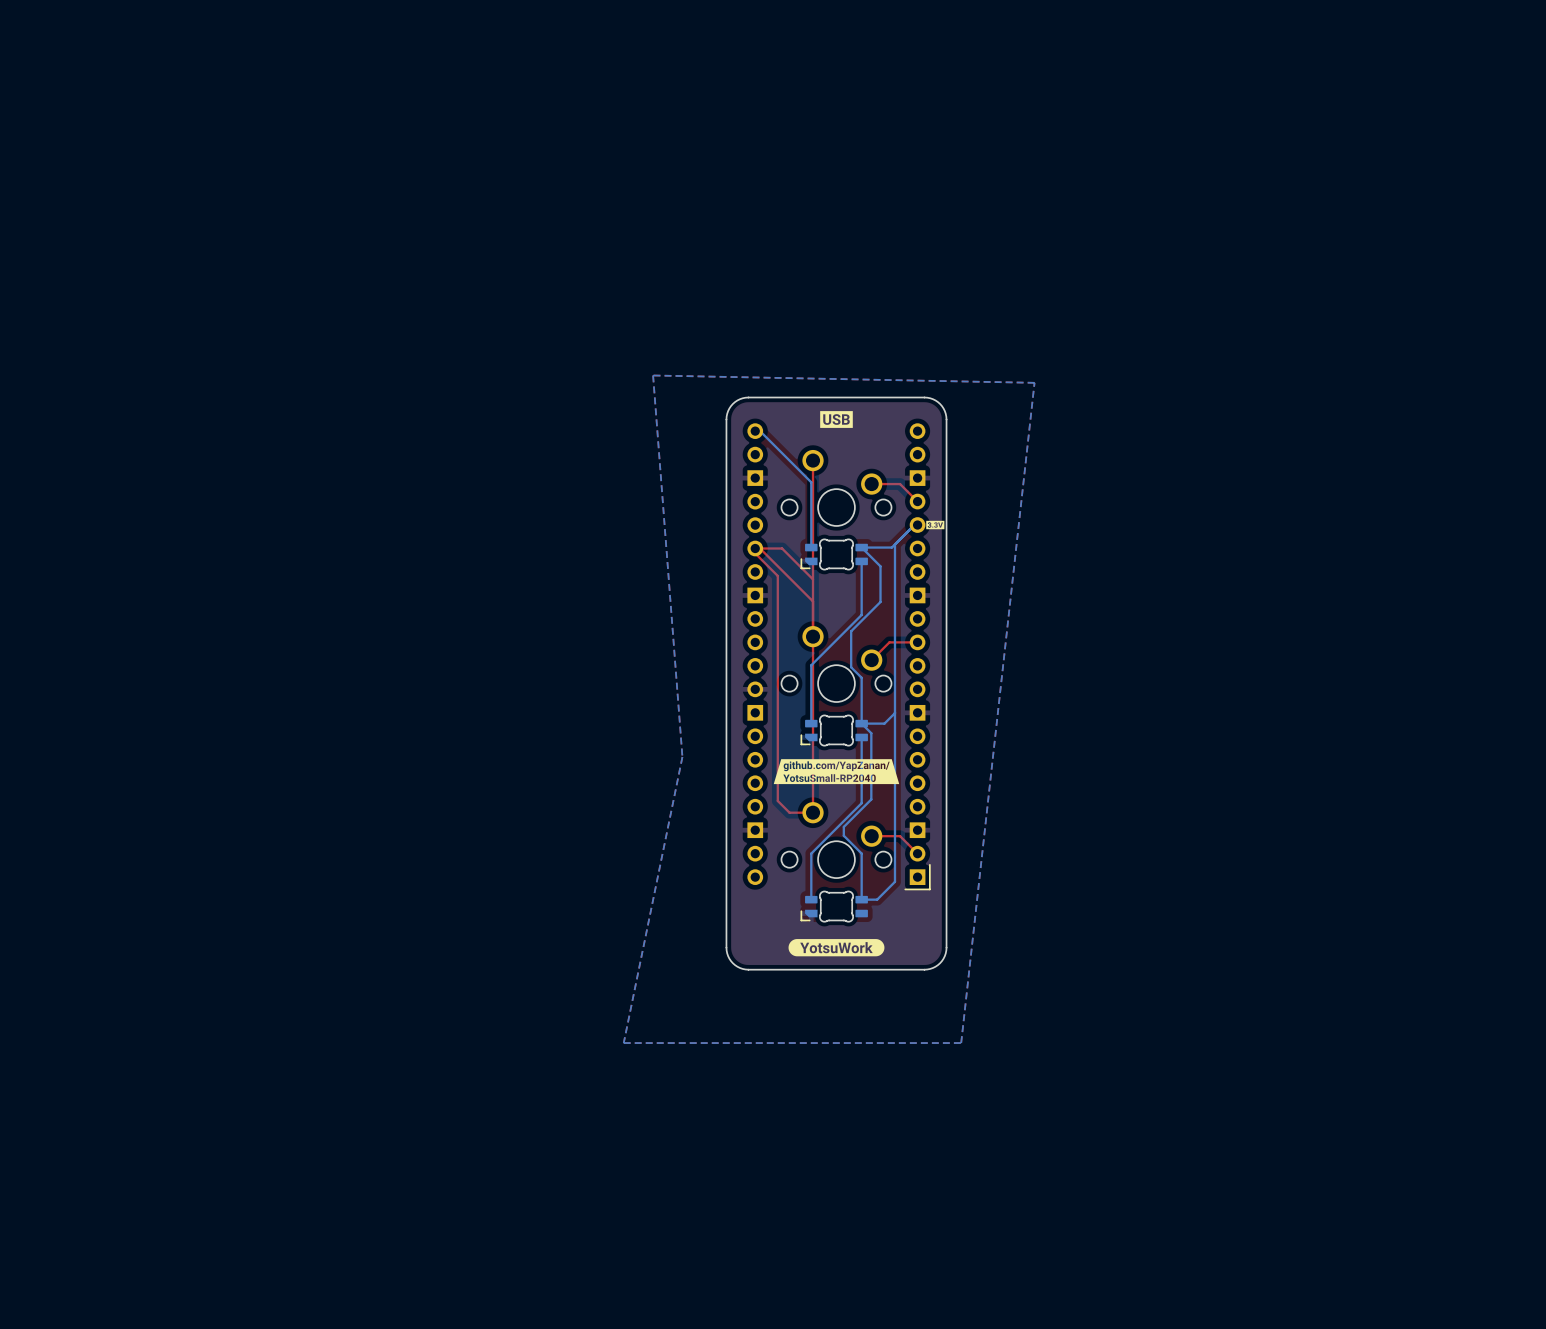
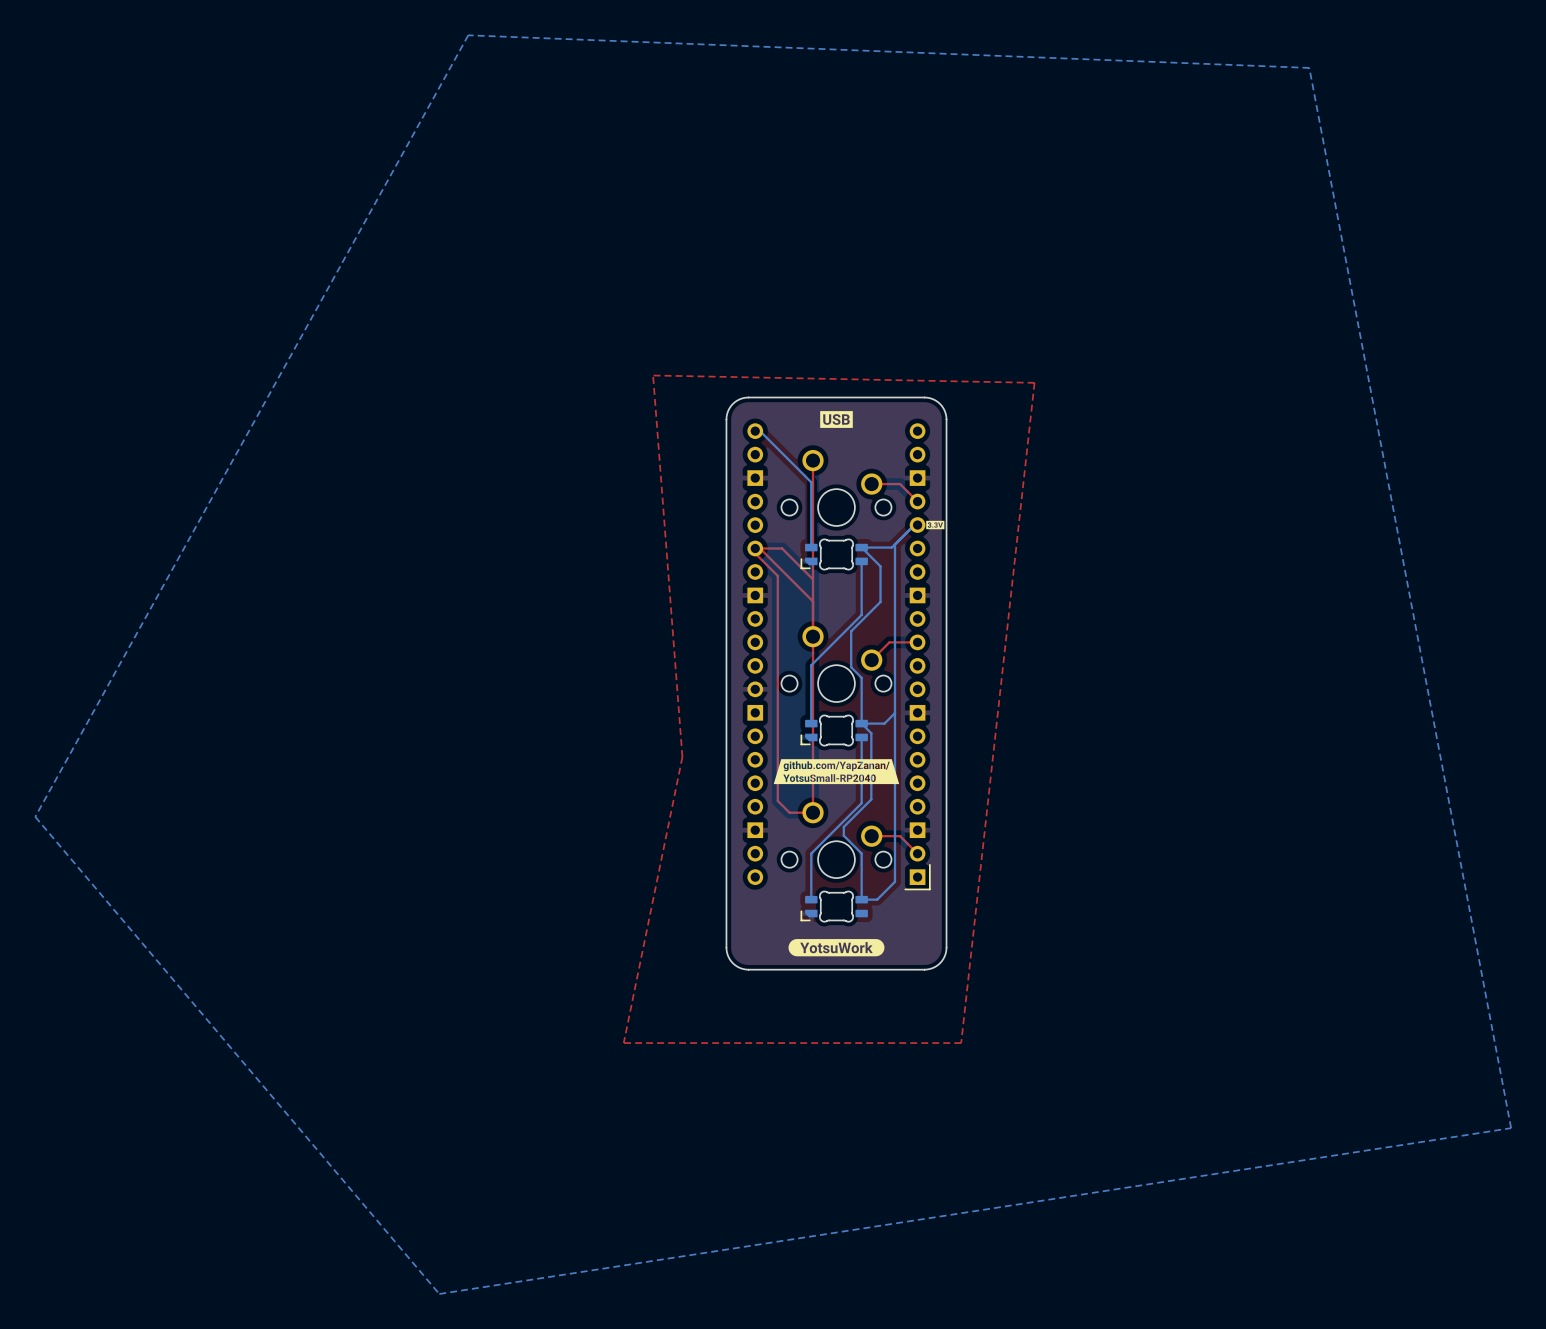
bottom zone outline: none -> (468, 35) (1309, 67) (1511, 1128) (439, 1293) (35, 816) (468, 35)
bottom zone outline: (653, 375) (1034, 382) (961, 1043) (623, 1043) (682, 756) (653, 375) -> none

